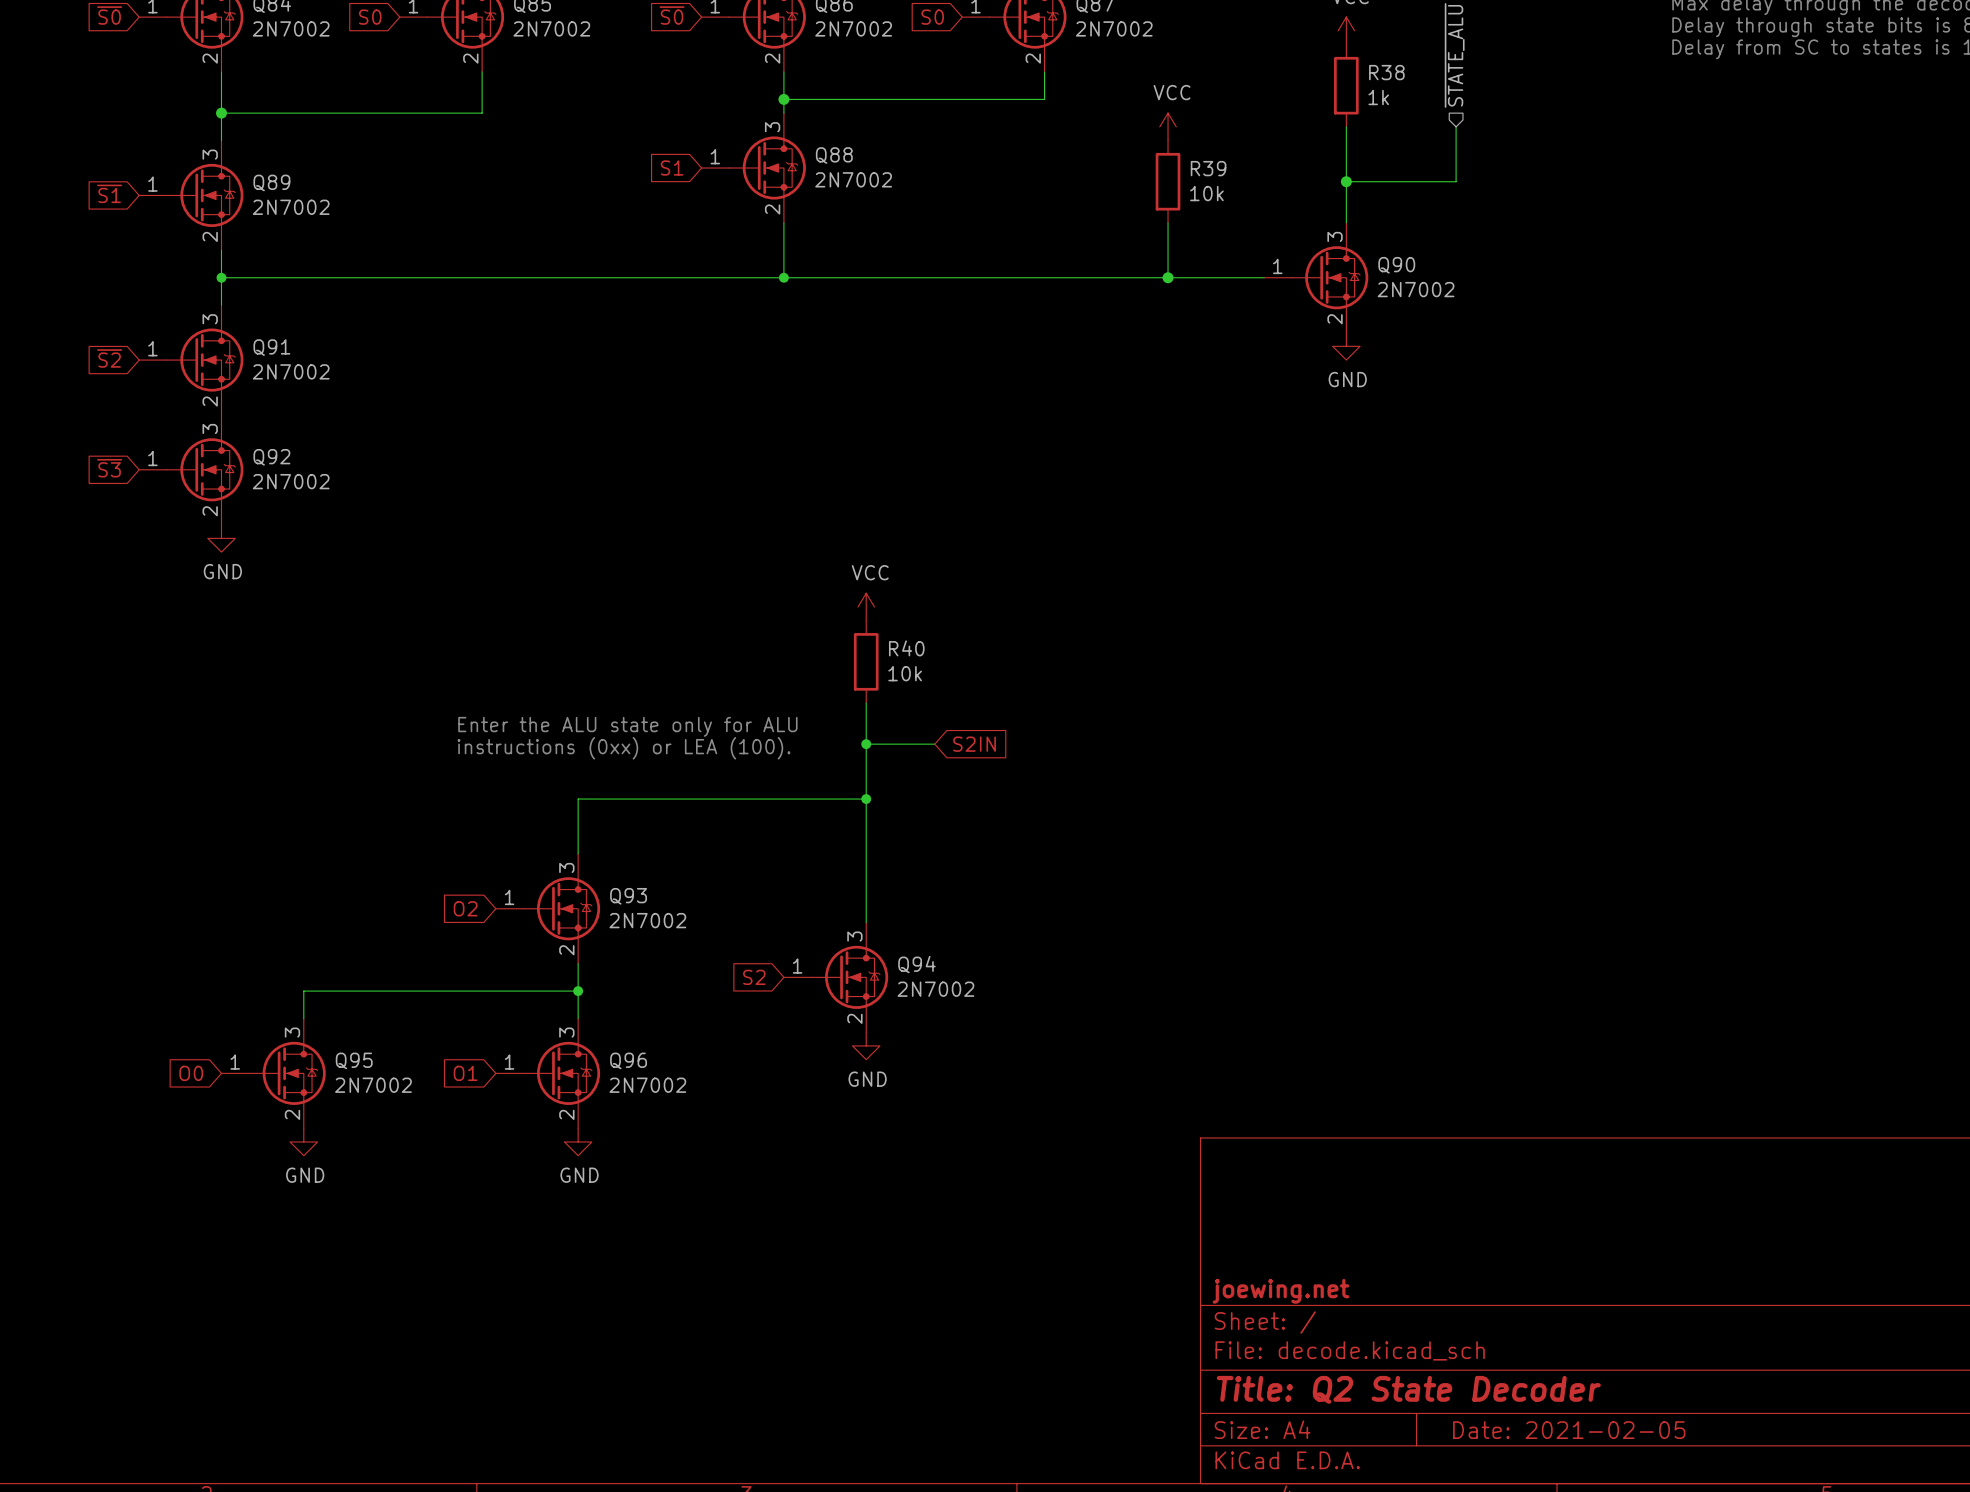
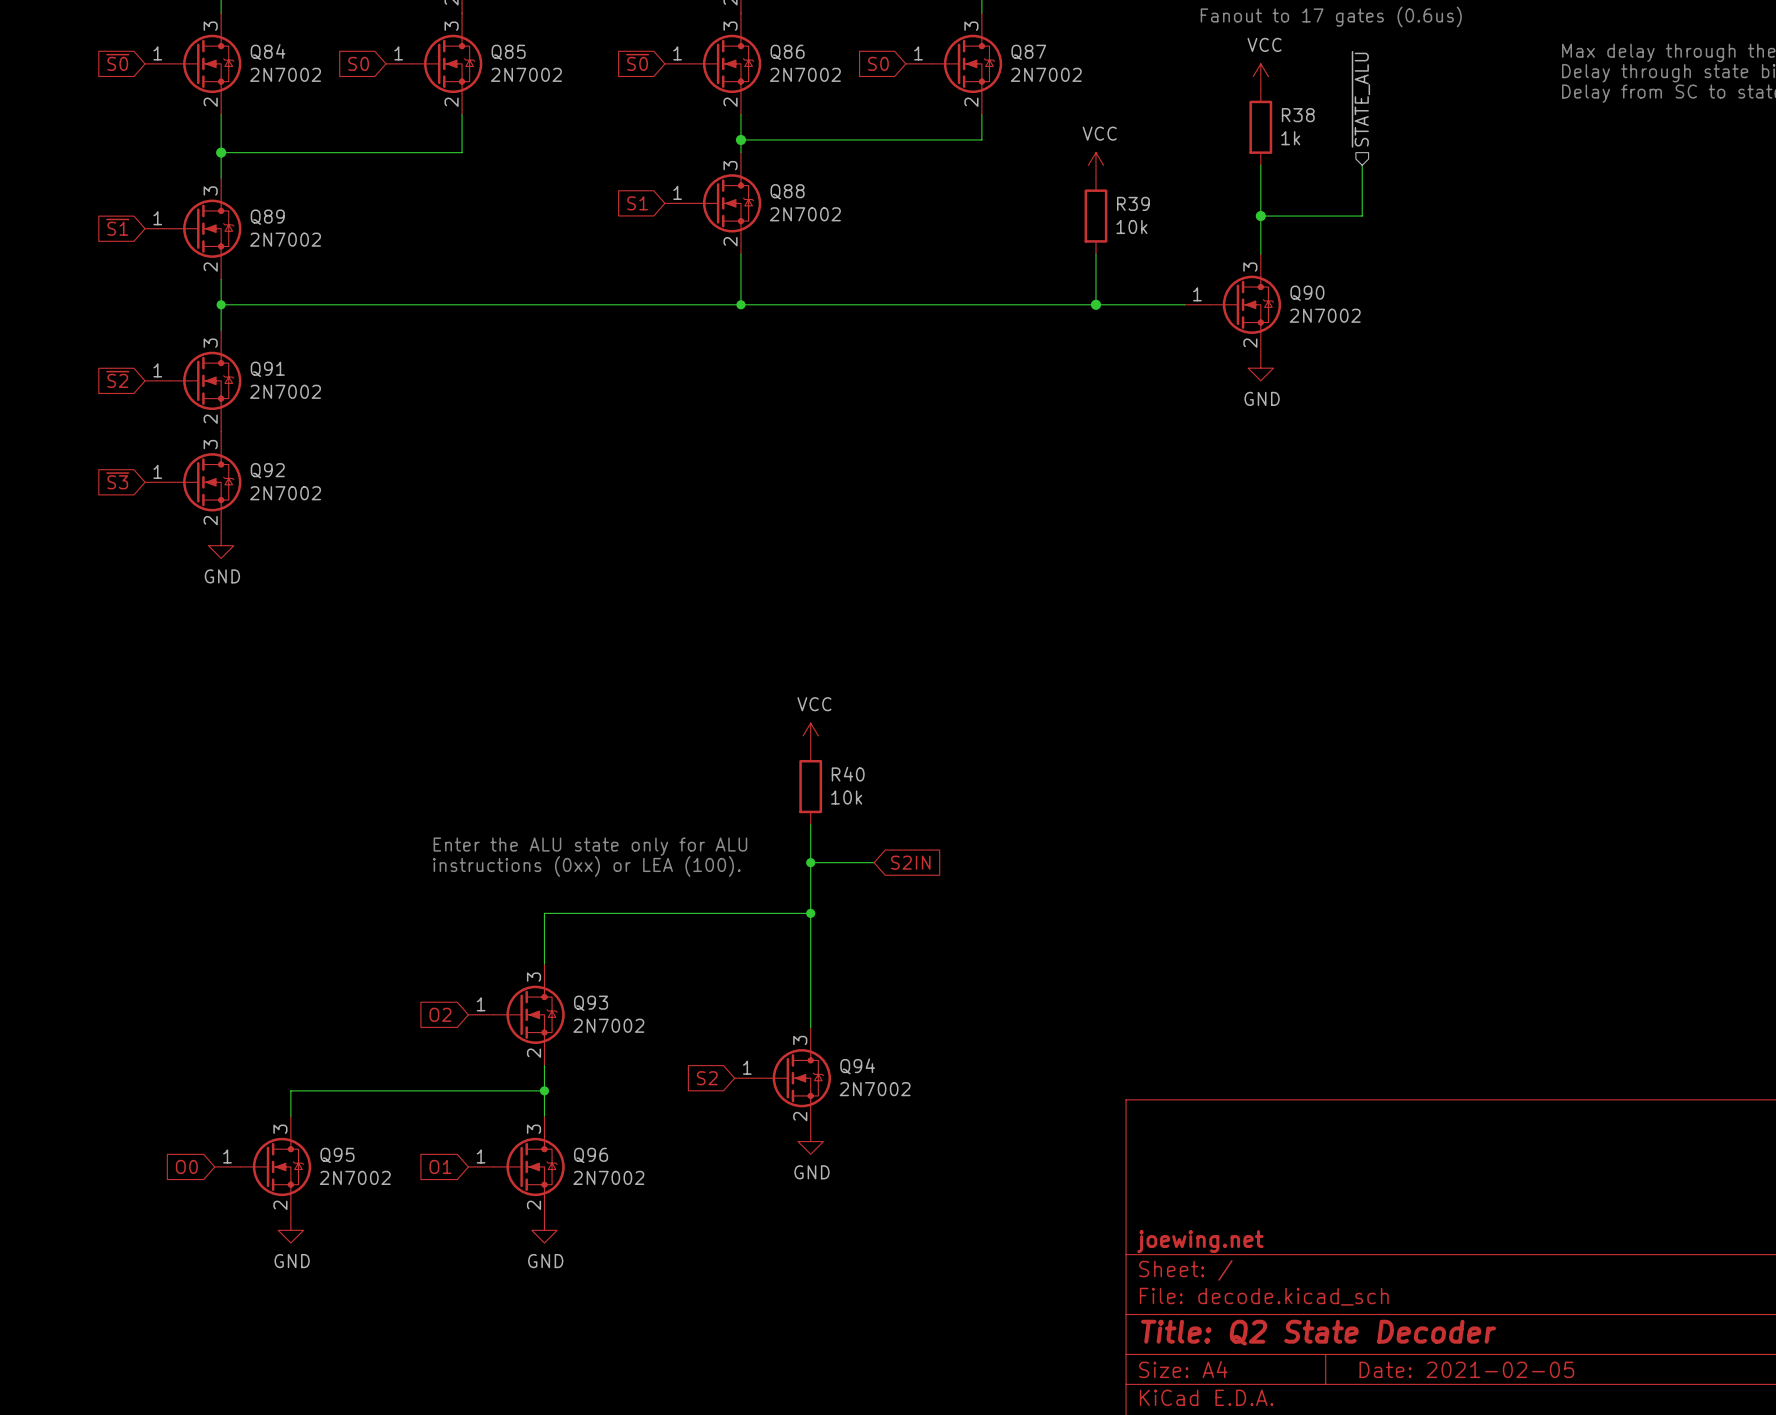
power symbol position: VCC (866, 606) -> VCC (810, 735)
R40 position: (866, 661) -> (810, 786)
wire: (866, 703) (866, 922) -> (810, 824) (810, 1027)
text position: Enter the ALU state only for ALU (627, 726) -> Enter the ALU state only for ALU (590, 846)
wire: (866, 744) (934, 744) -> (810, 862) (874, 862)
junction: (866, 744) -> none
global label position: S2IN (974, 744) -> S2IN (910, 862)
text position: instructions (0xx) or LEA (100). (623, 748) -> instructions (0xx) or LEA (100). (586, 866)
wire: (866, 799) (578, 799) (578, 853) -> (810, 913) (544, 913) (544, 964)
junction: (866, 799) -> none
junction: none -> (810, 862)
global label position: O2 (465, 908) -> O2 (440, 1014)
Q93 position: (547, 908) -> (516, 1014)
junction: none -> (810, 913)
wire: (578, 963) (578, 1018) -> (544, 1065) (544, 1116)
global label position: S2 (754, 977) -> S2 (707, 1078)
Q94 position: (836, 977) -> (782, 1078)
wire: (578, 991) (303, 991) (303, 1018) -> (544, 1090) (290, 1090) (290, 1116)
junction: (578, 991) -> none
power symbol position: GND (866, 1045) -> GND (810, 1141)
global label position: O0 (191, 1073) -> O0 (186, 1166)
Q95 position: (273, 1073) -> (262, 1166)
global label position: O1 (465, 1073) -> O1 (440, 1166)
Q96 position: (547, 1073) -> (516, 1166)
junction: none -> (544, 1090)
power symbol position: GND (303, 1141) -> GND (290, 1230)
power symbol position: GND (578, 1141) -> GND (544, 1230)

